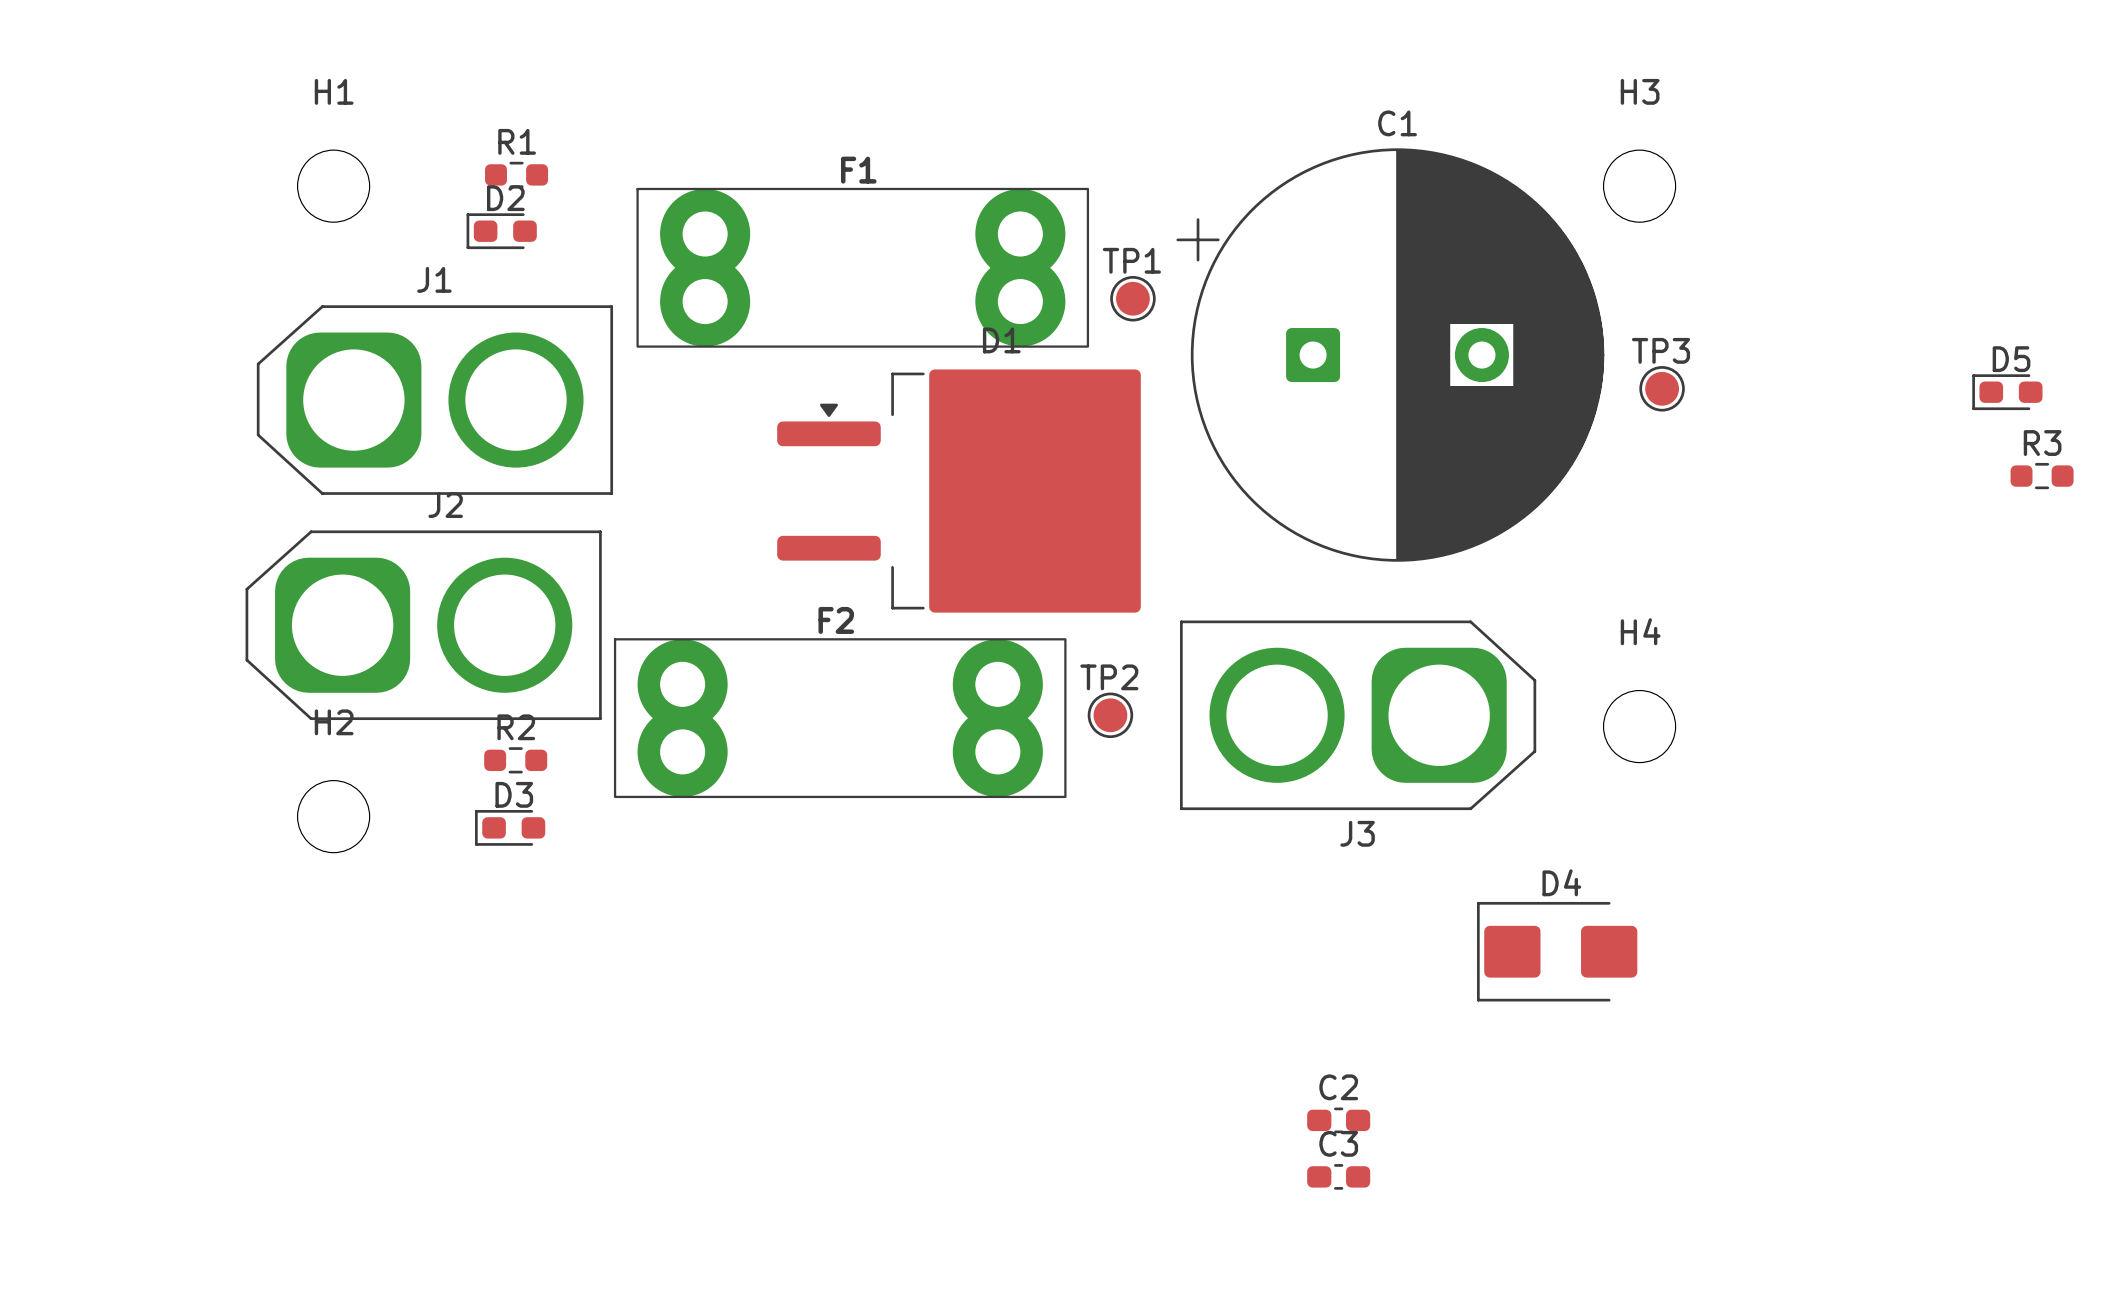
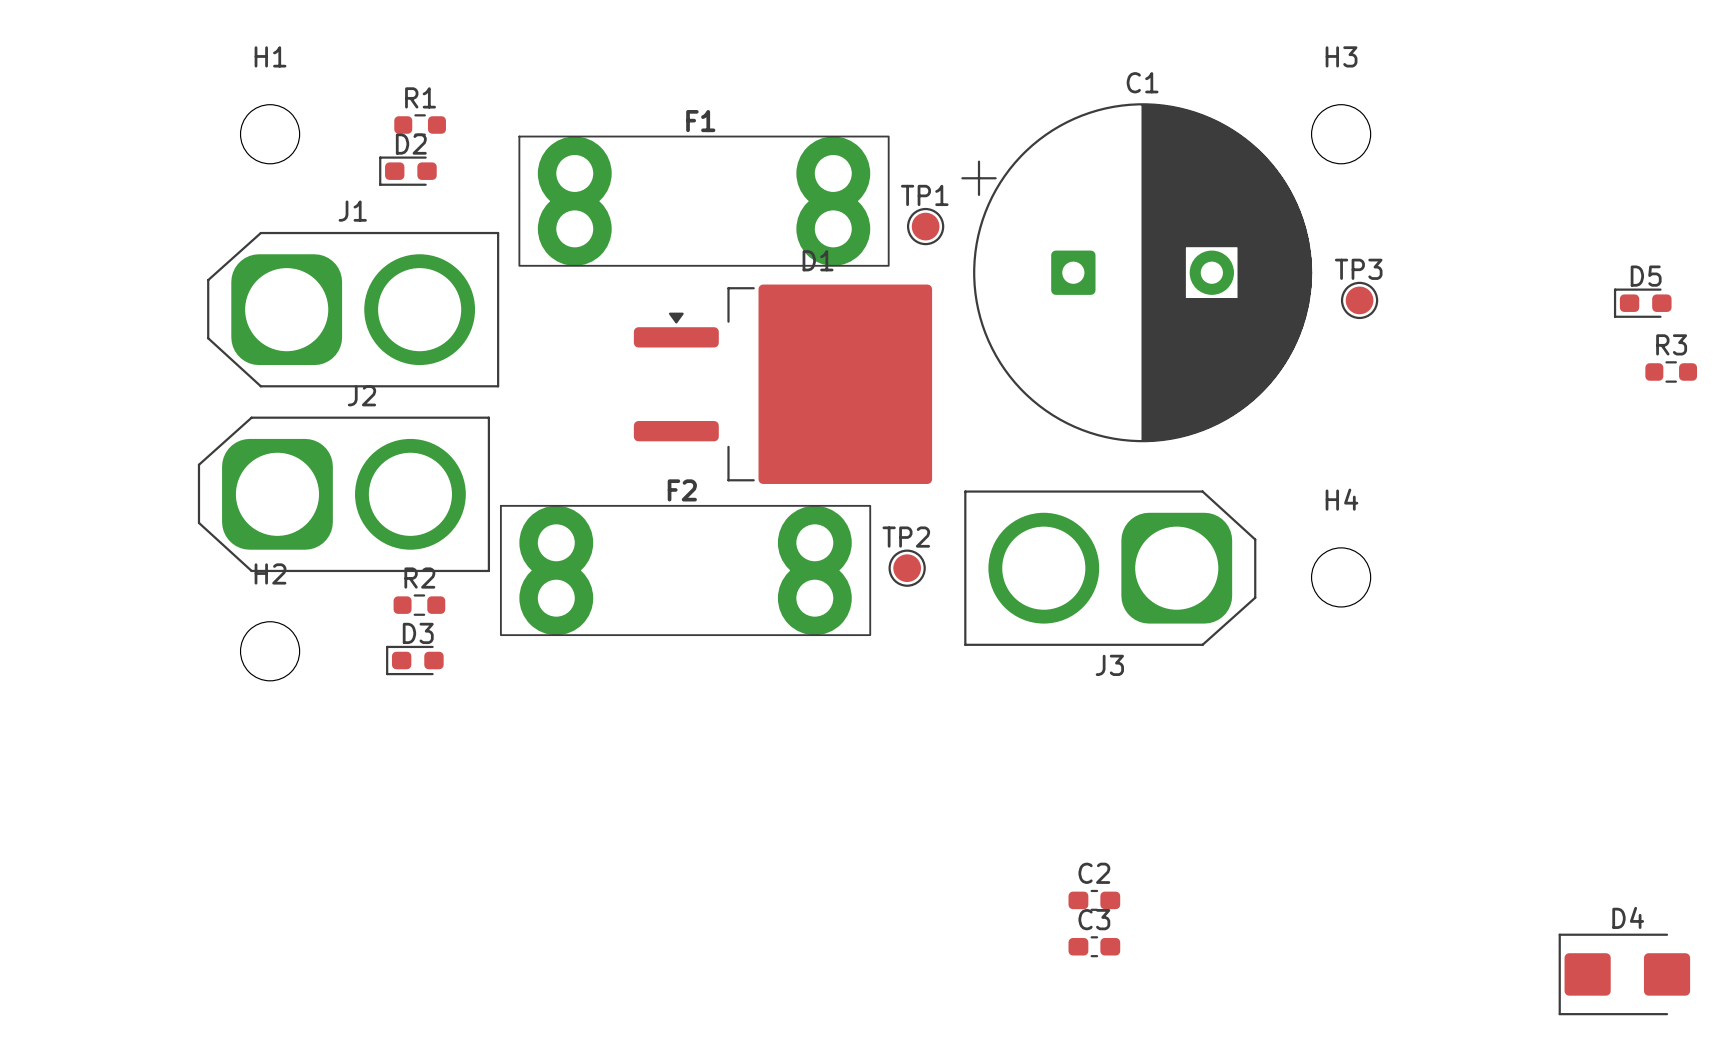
D4 position: (1557, 951) -> (1624, 974)

